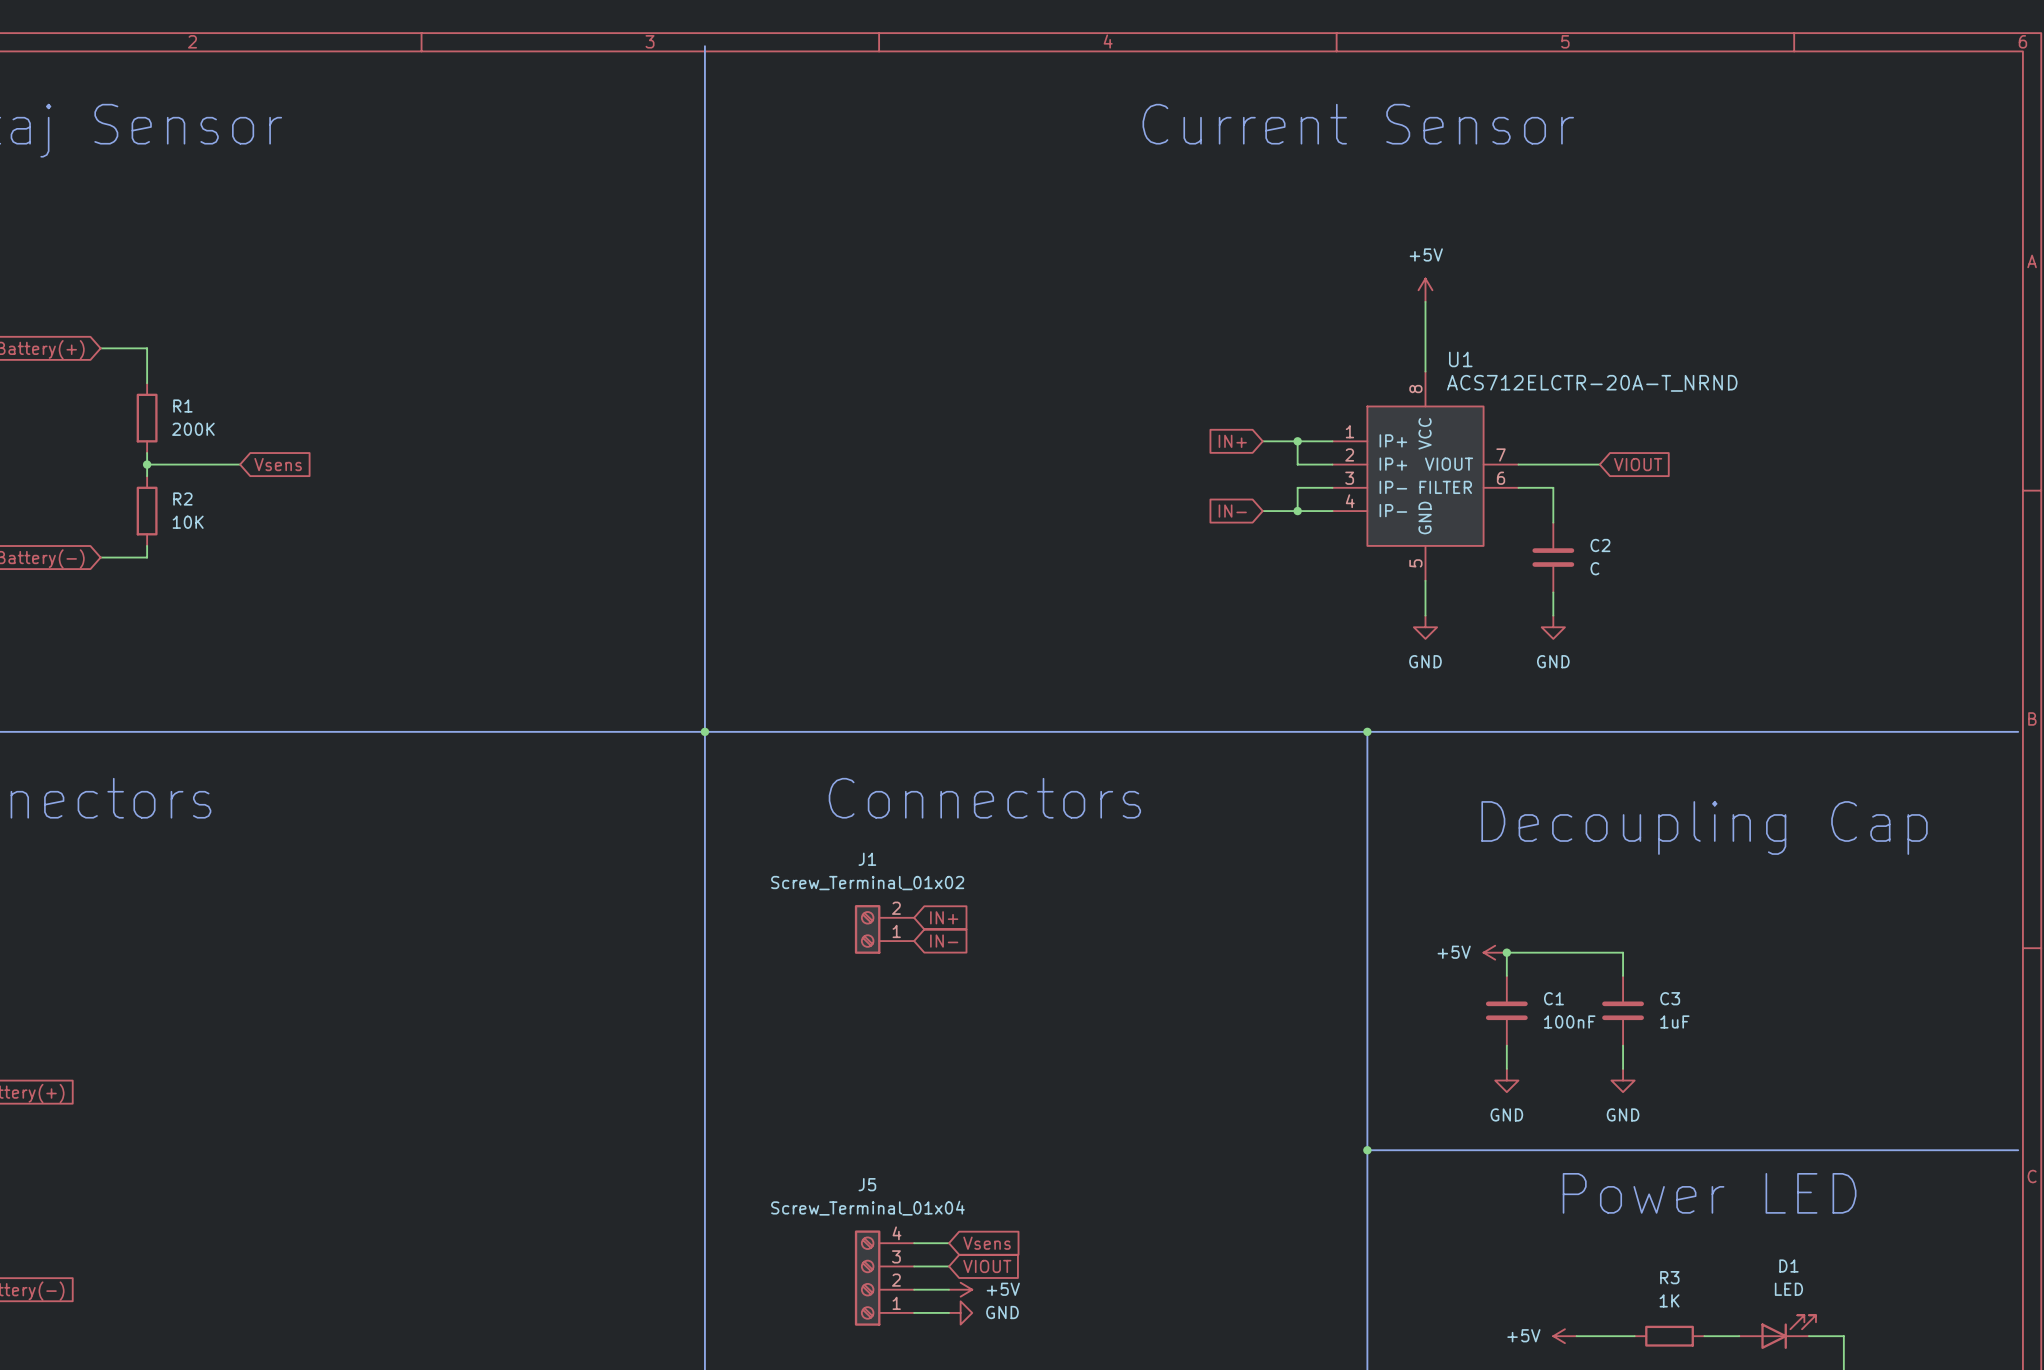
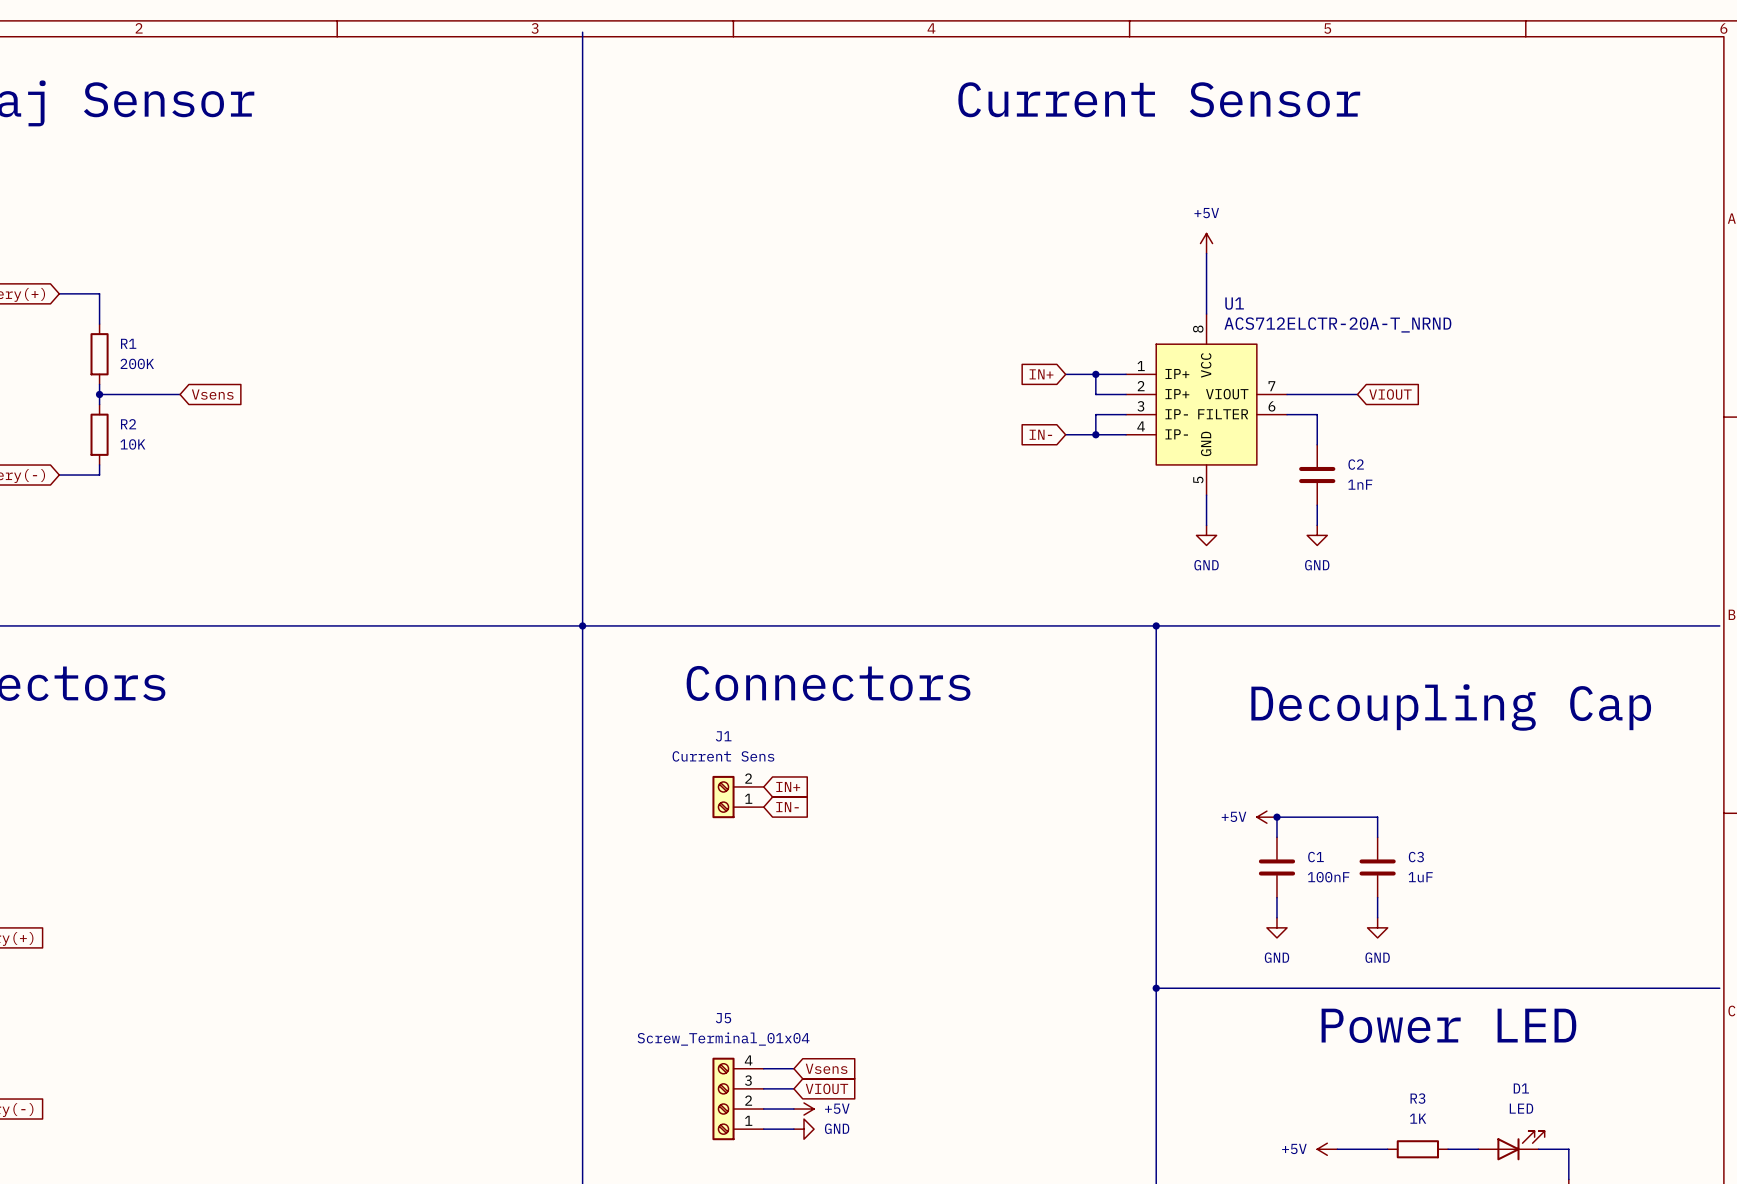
C2 value: C (1594, 568) -> 1nF (1360, 484)
J1 value: Screw_Terminal_01x02 (867, 883) -> Current Sens (723, 756)

